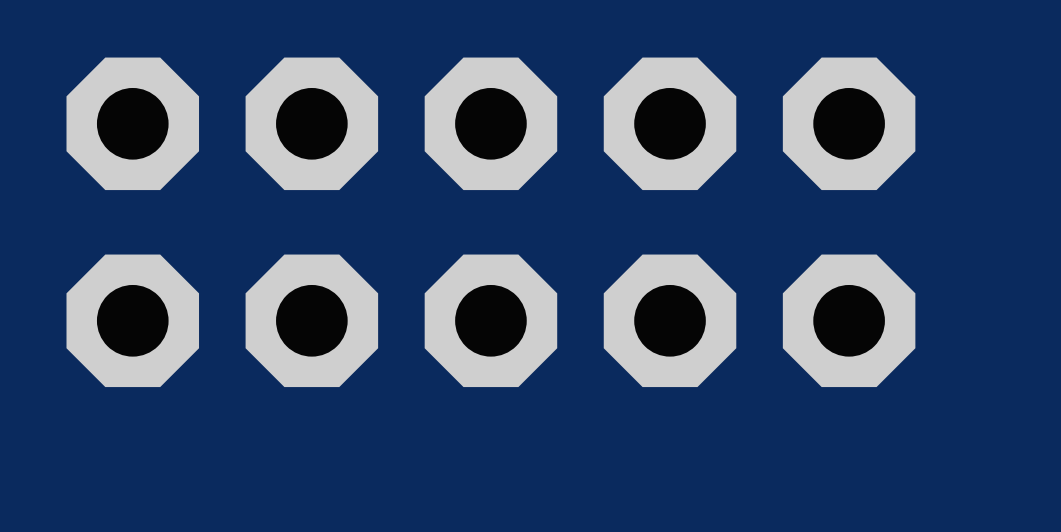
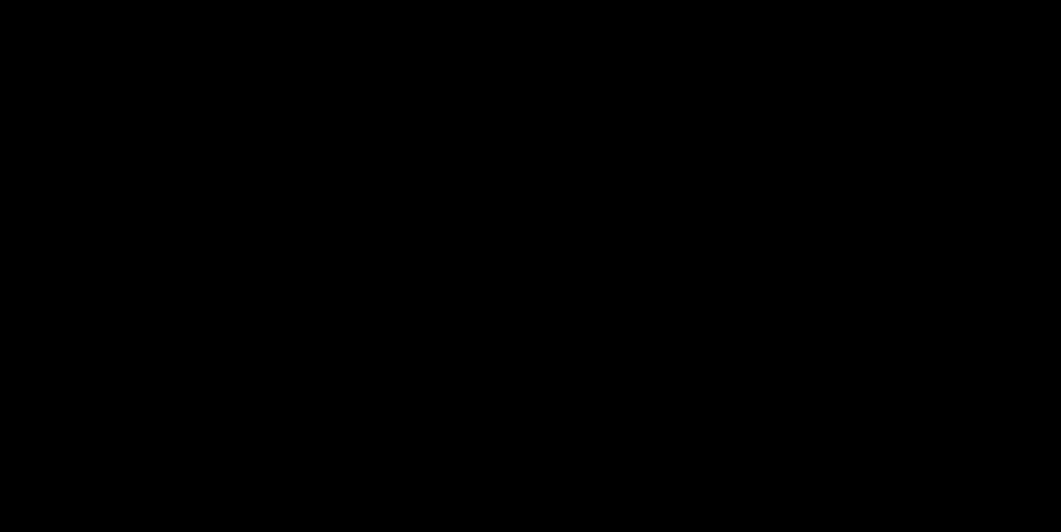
part: (490, 222) -> none

